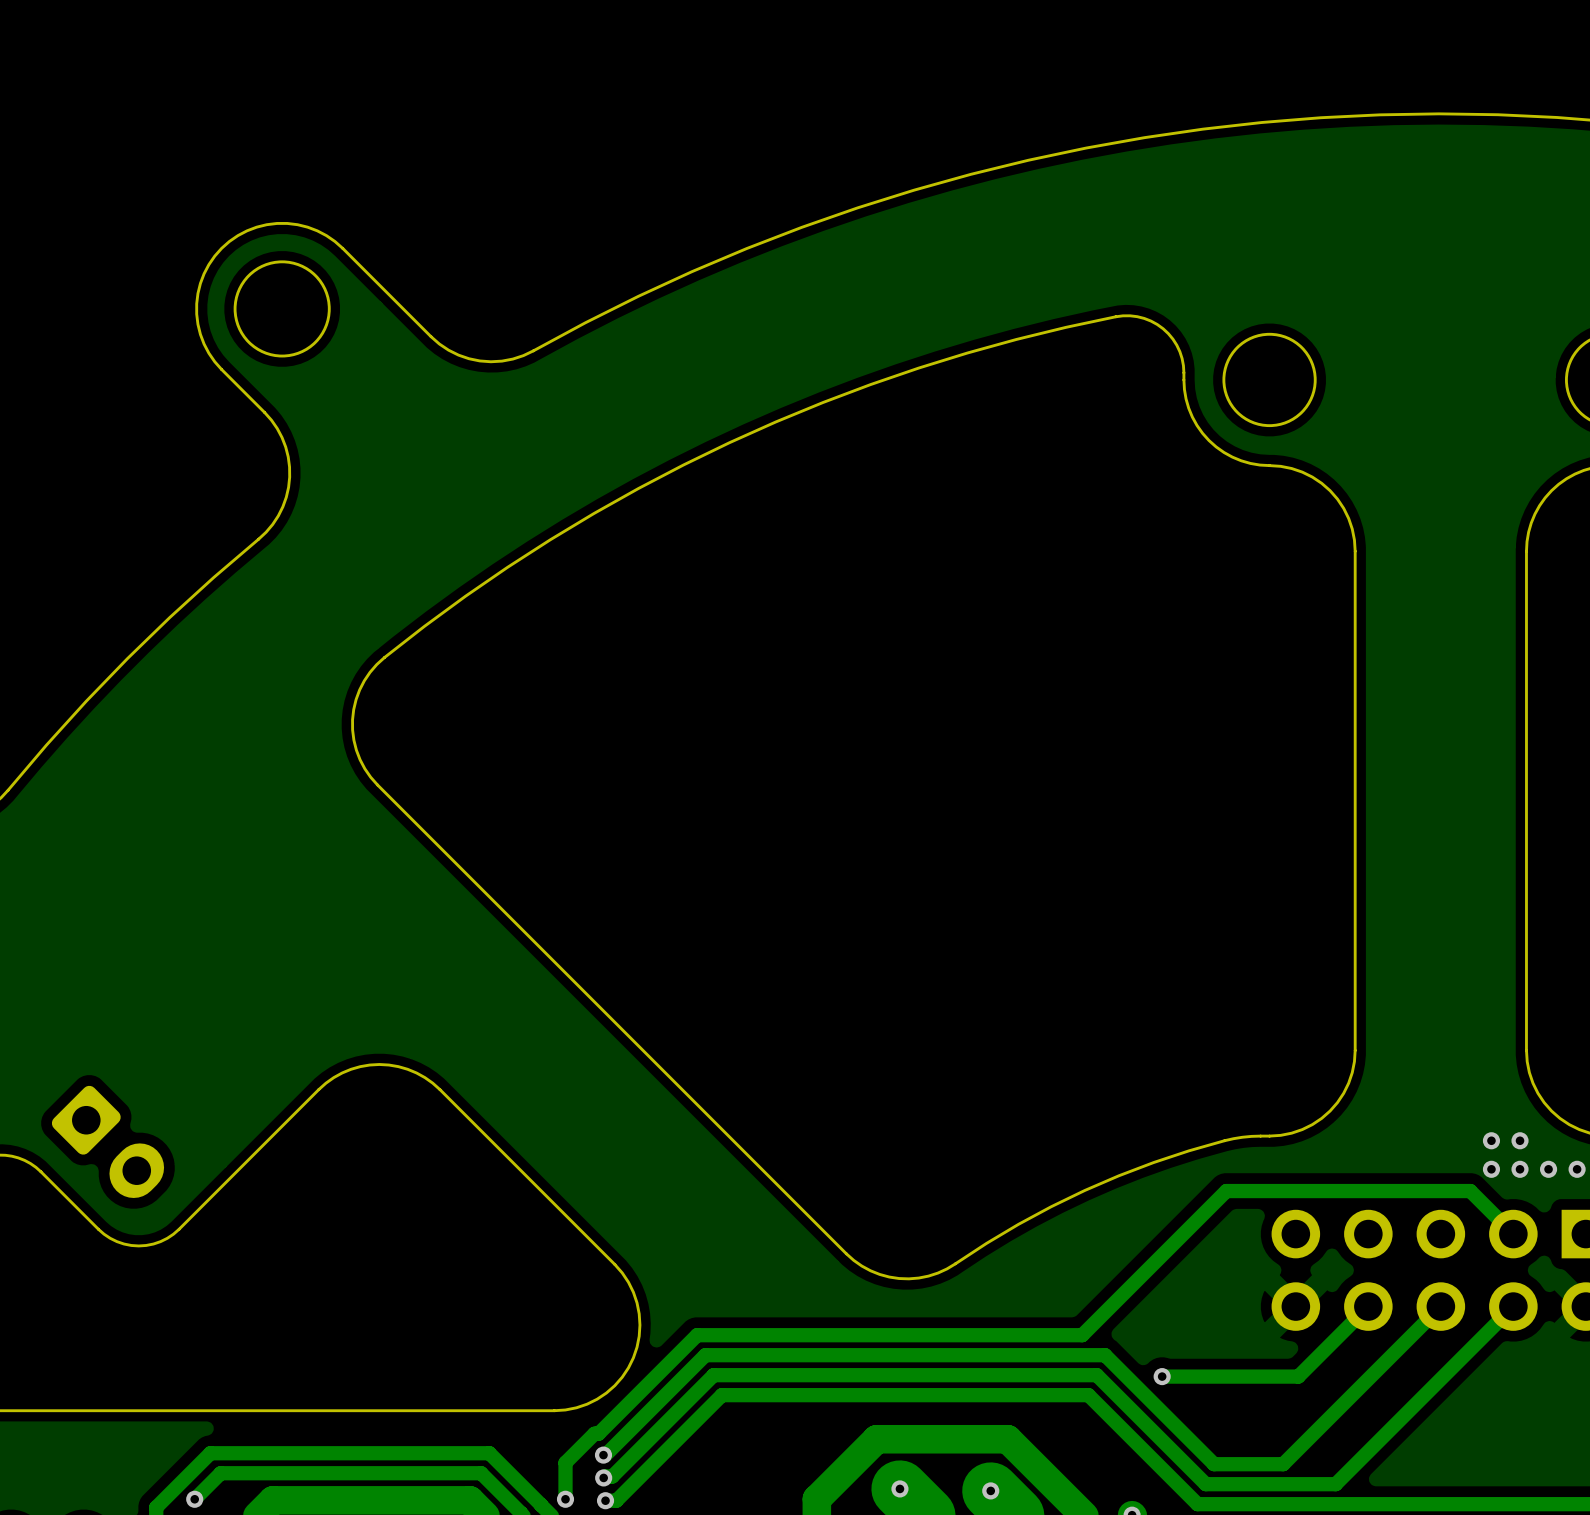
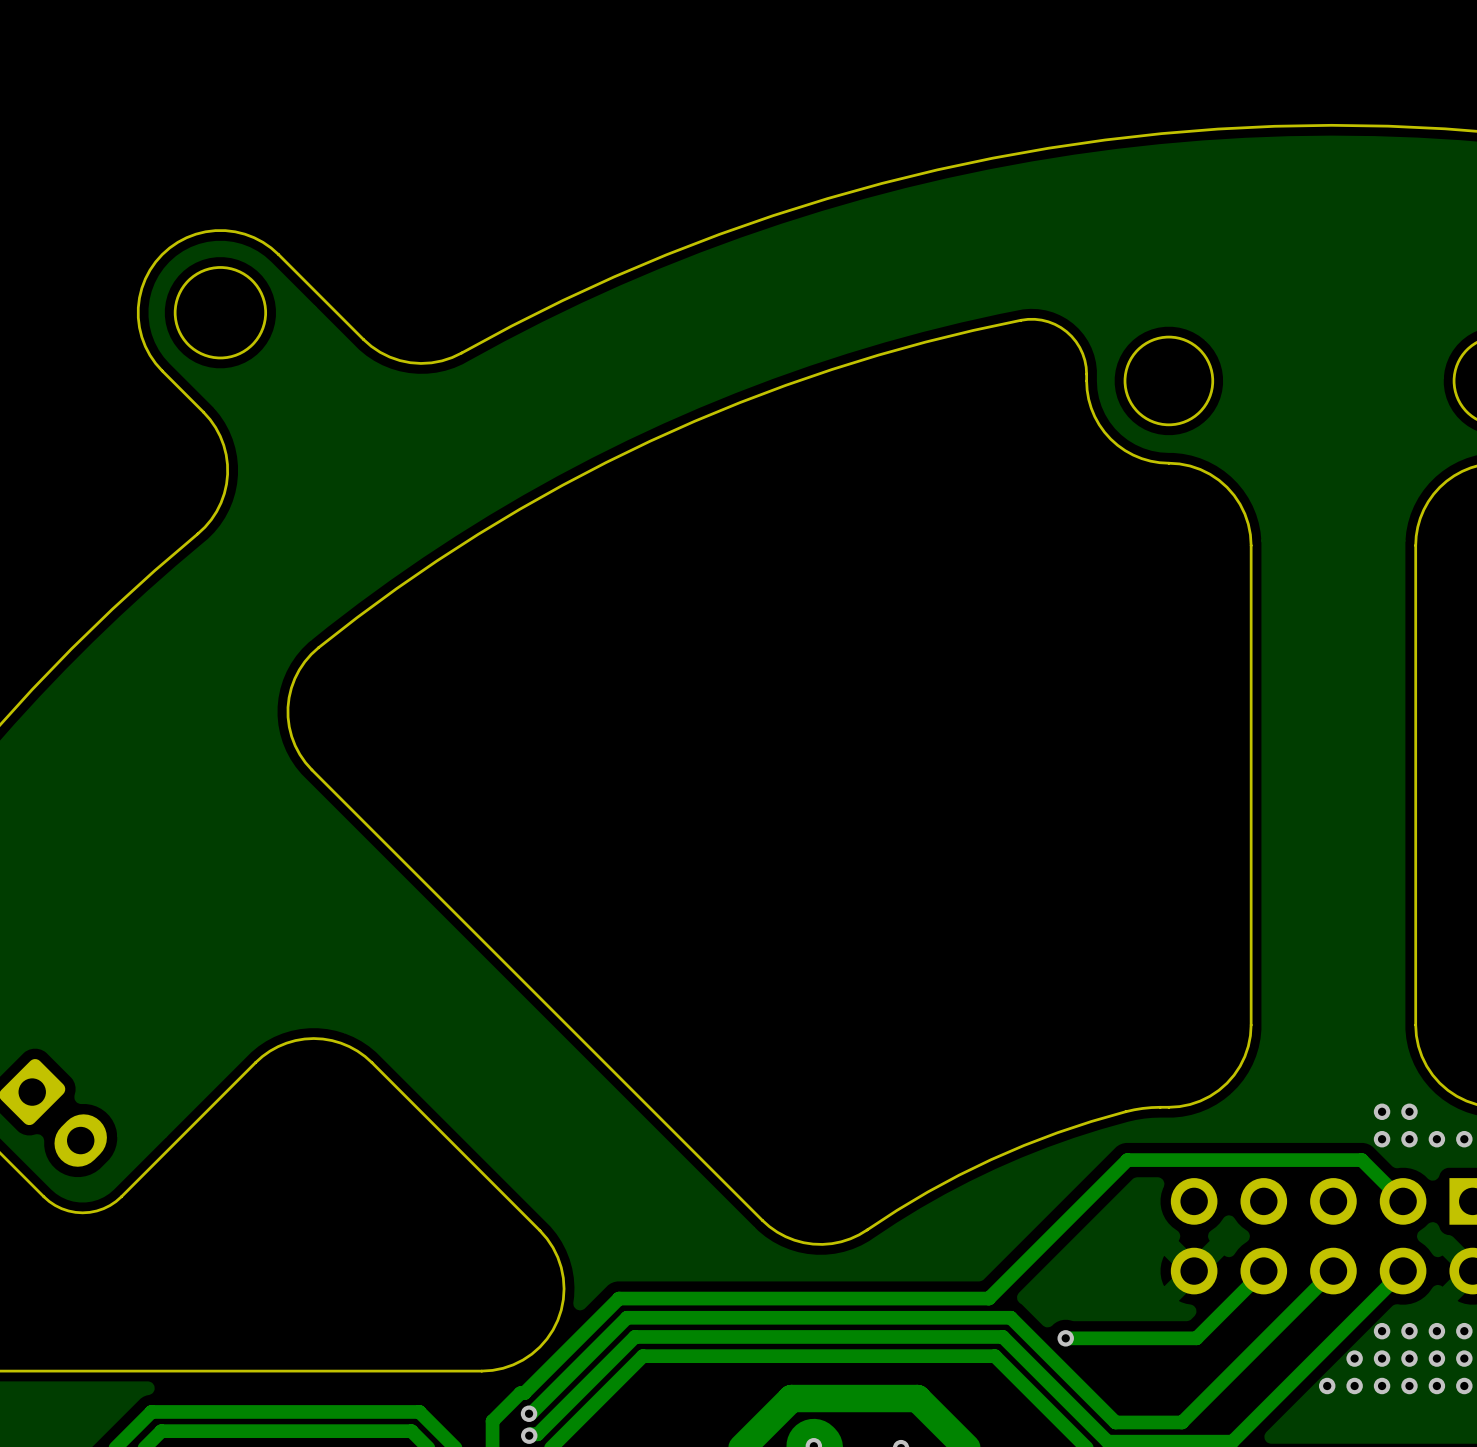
via: none -> (1382, 1331)
via: none -> (1409, 1331)
via: none -> (1436, 1331)
via: none -> (1464, 1331)
via: none -> (1354, 1358)
via: none -> (1382, 1358)
via: none -> (1409, 1358)
via: none -> (1436, 1358)
via: none -> (1464, 1358)
via: none -> (1327, 1386)
via: none -> (1354, 1386)
via: none -> (1382, 1386)
via: none -> (1409, 1386)
via: none -> (1436, 1386)
via: none -> (1464, 1386)

